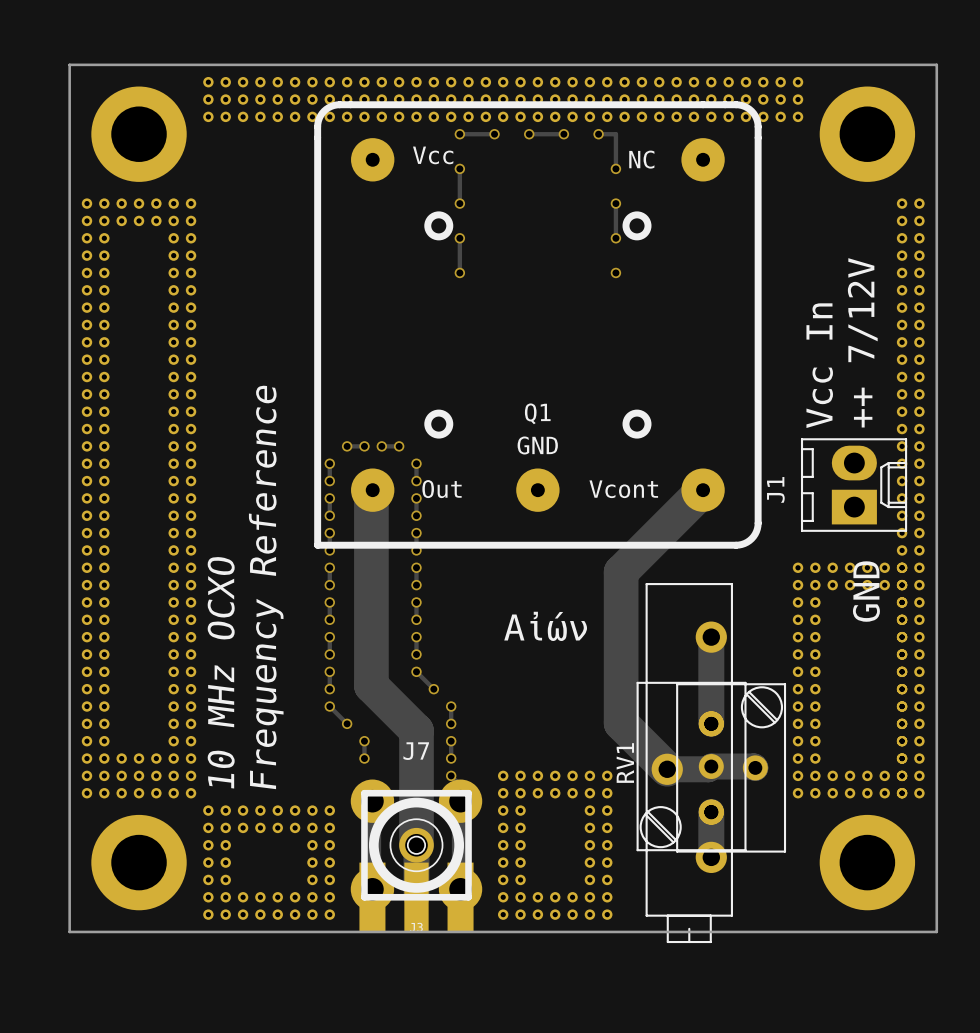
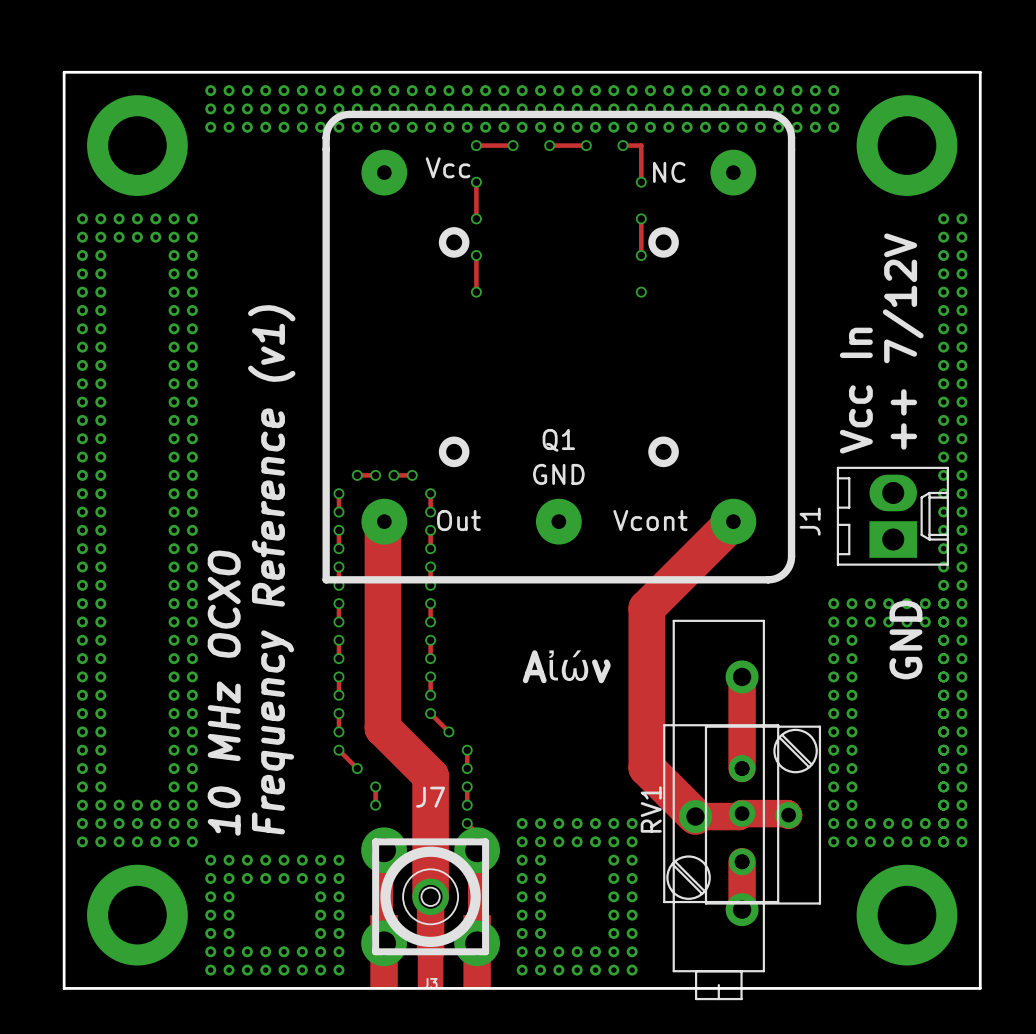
text: Frequency Reference (266, 587) -> Frequency Reference (v1) (271, 569)

